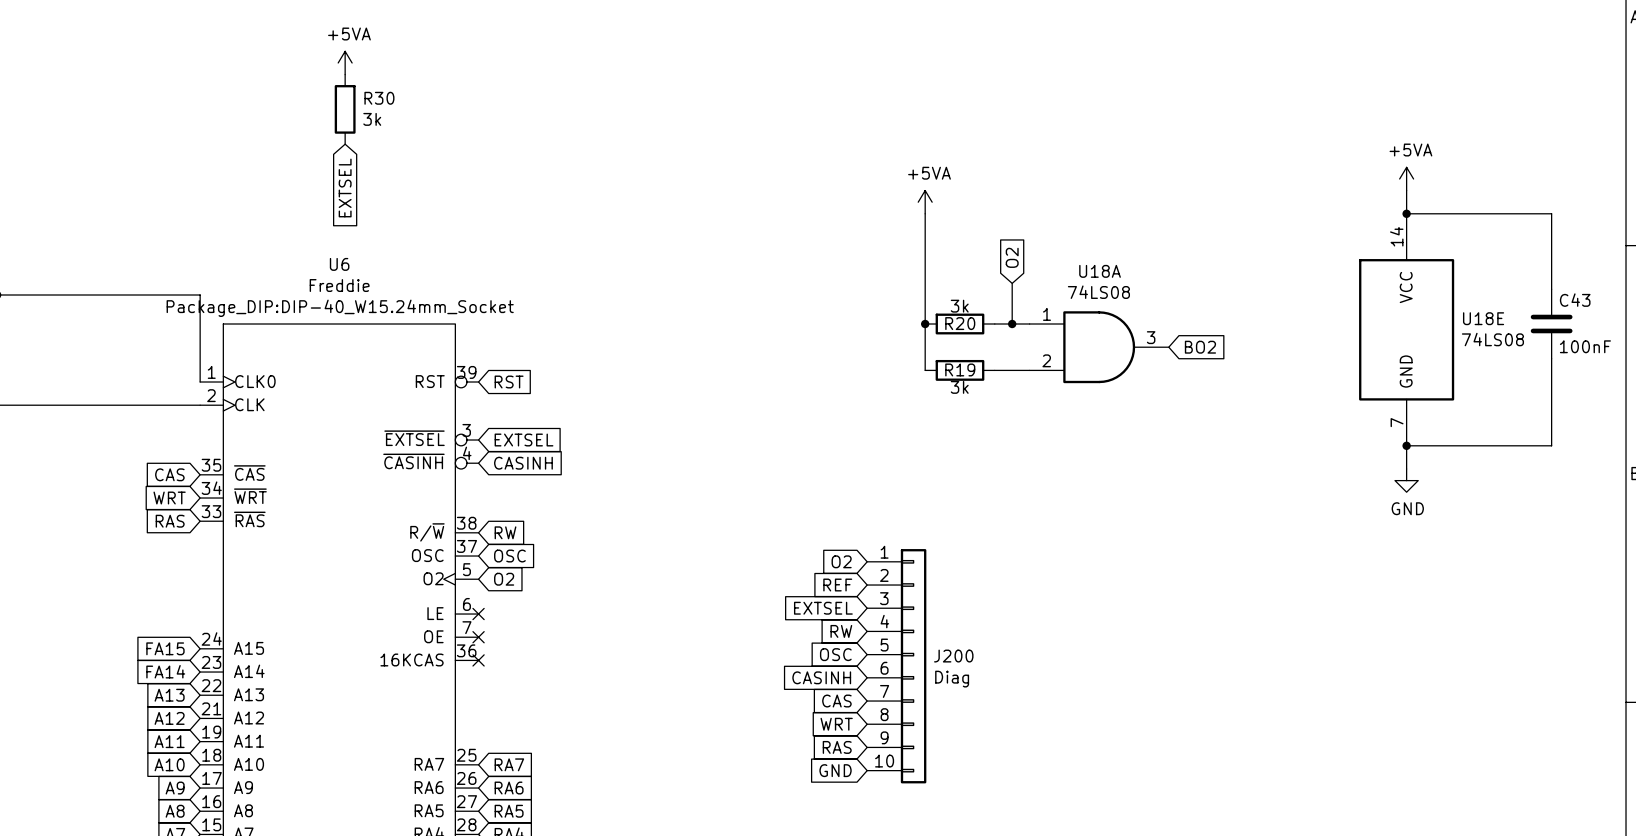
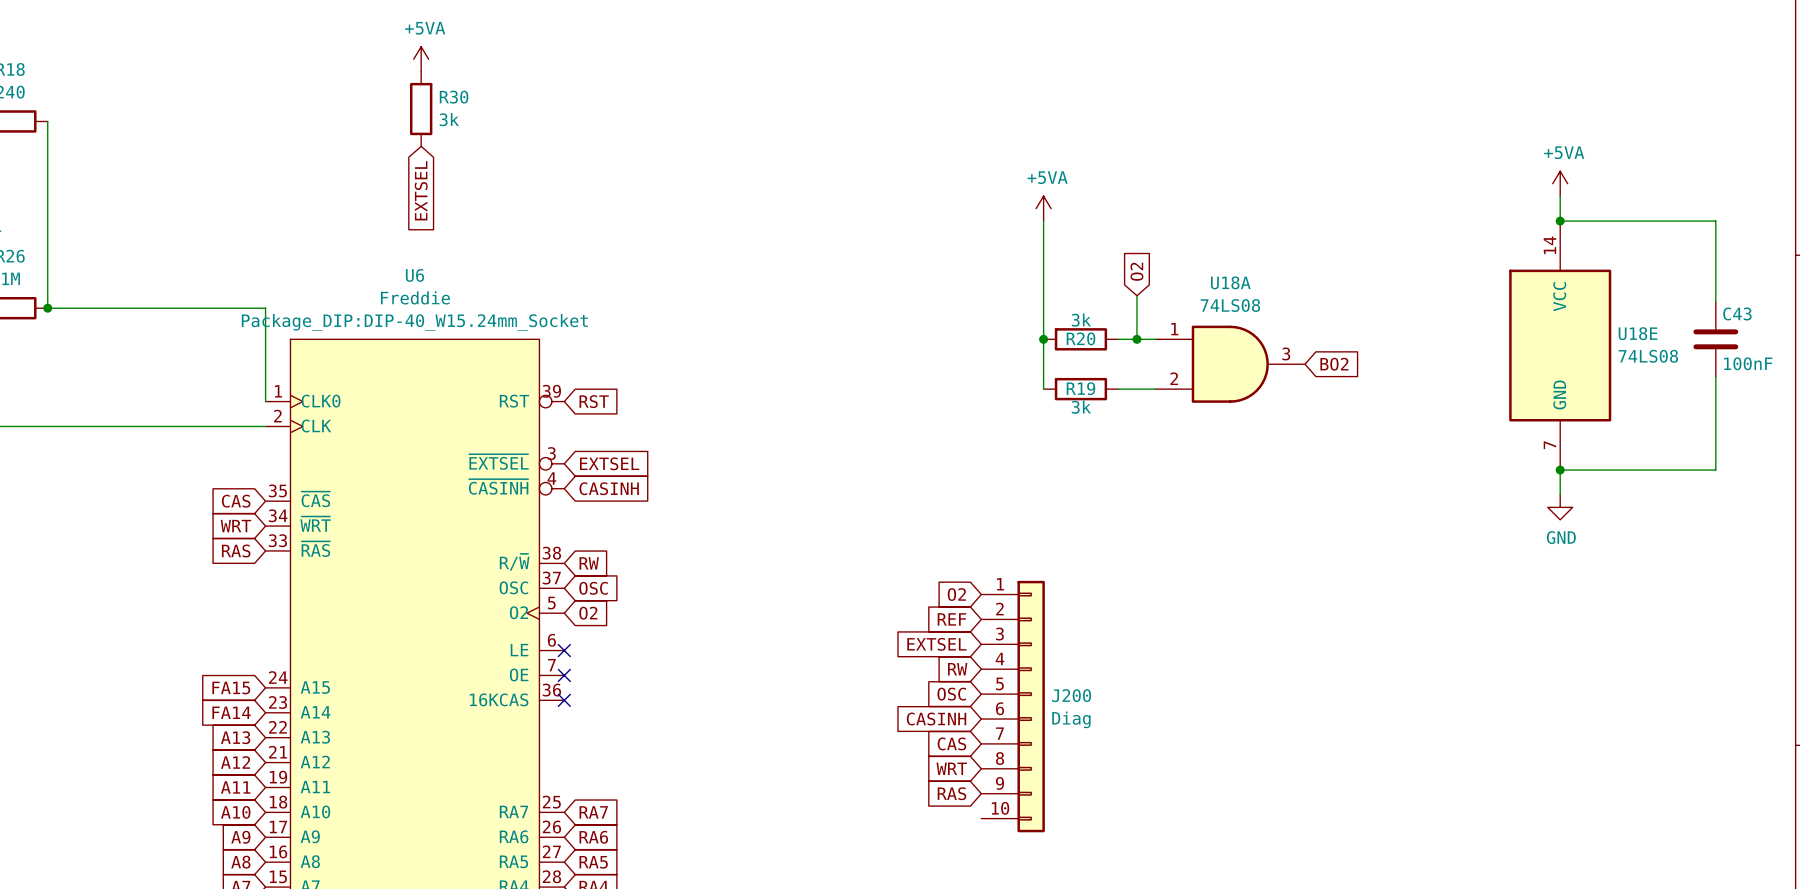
global label: GND (835, 770) -> none

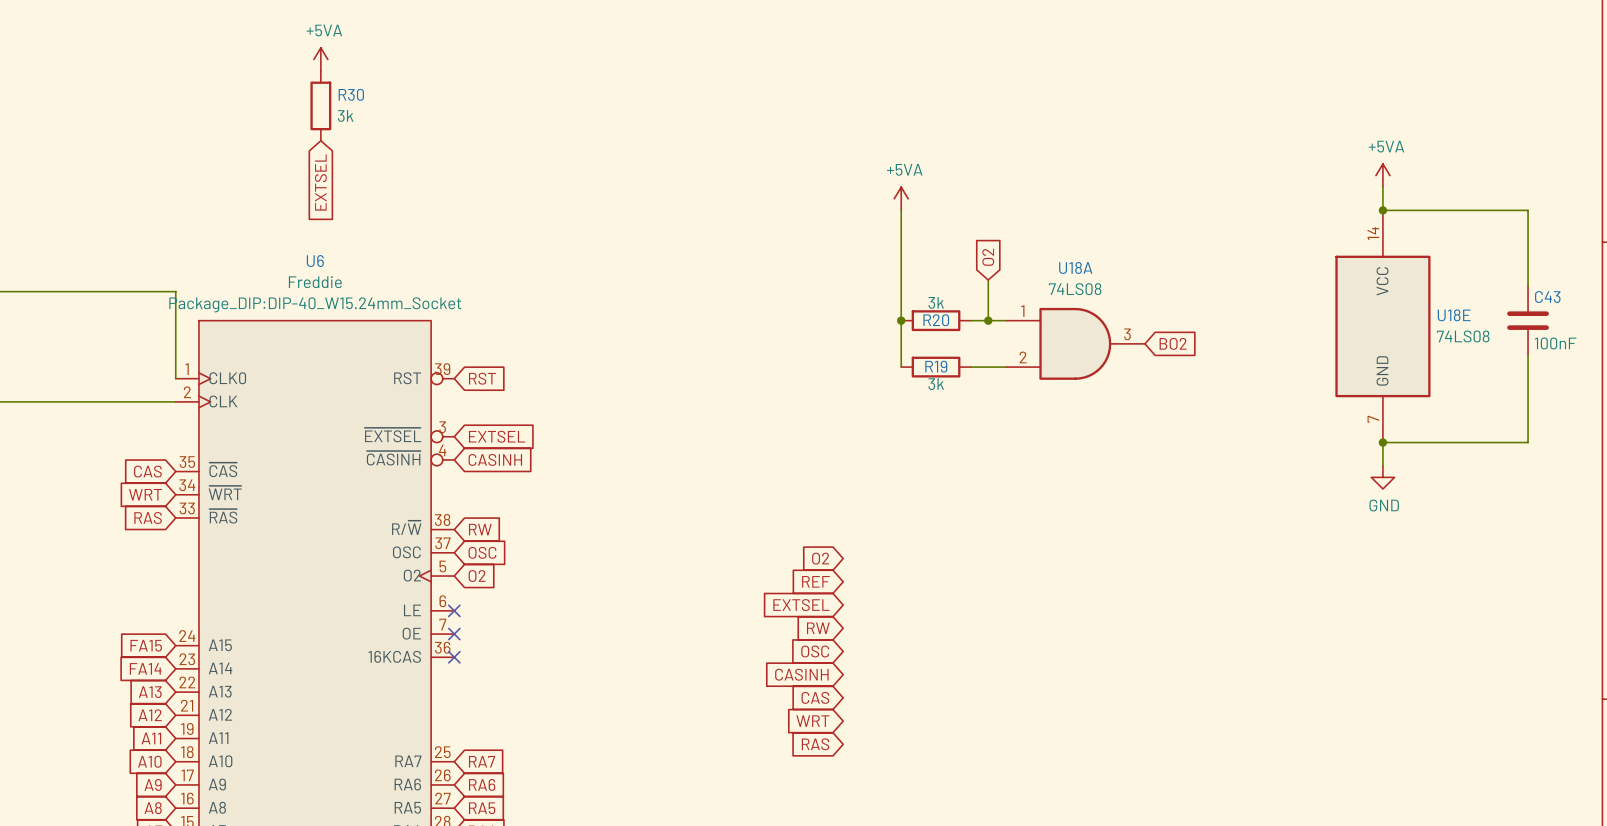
J200: Diag (1013, 706) -> none

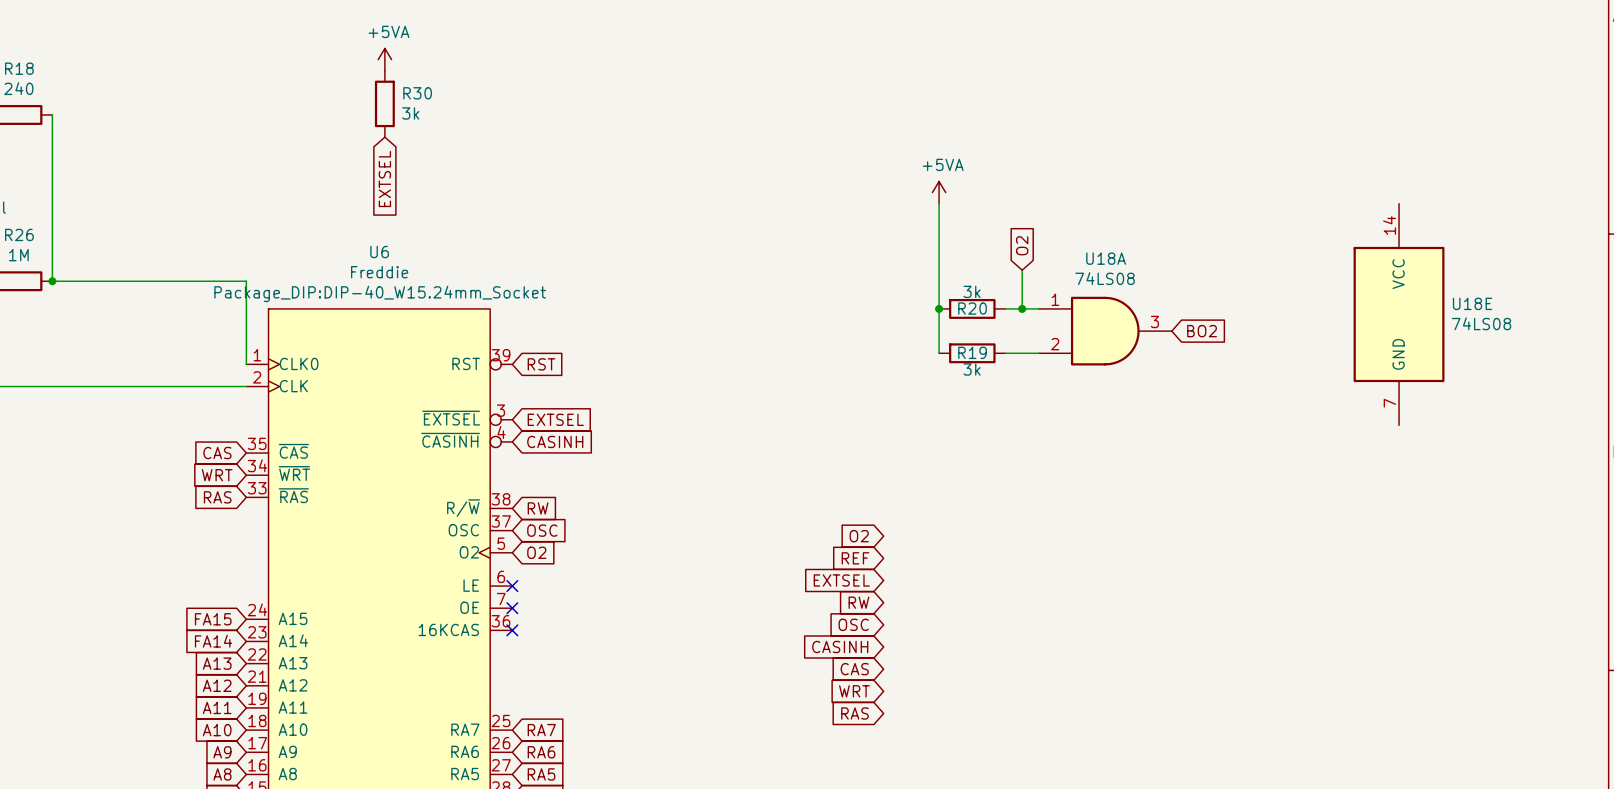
power symbol: +5VA (1382, 175) -> none
wire: (1382, 187) (1382, 210) (1528, 210) (1528, 285) -> none
junction: (1382, 210) -> none
C43: 100nF (1528, 320) -> none
wire: (1528, 355) (1528, 442) (1382, 442) (1382, 465) -> none
junction: (1382, 442) -> none
power symbol: GND (1382, 477) -> none

